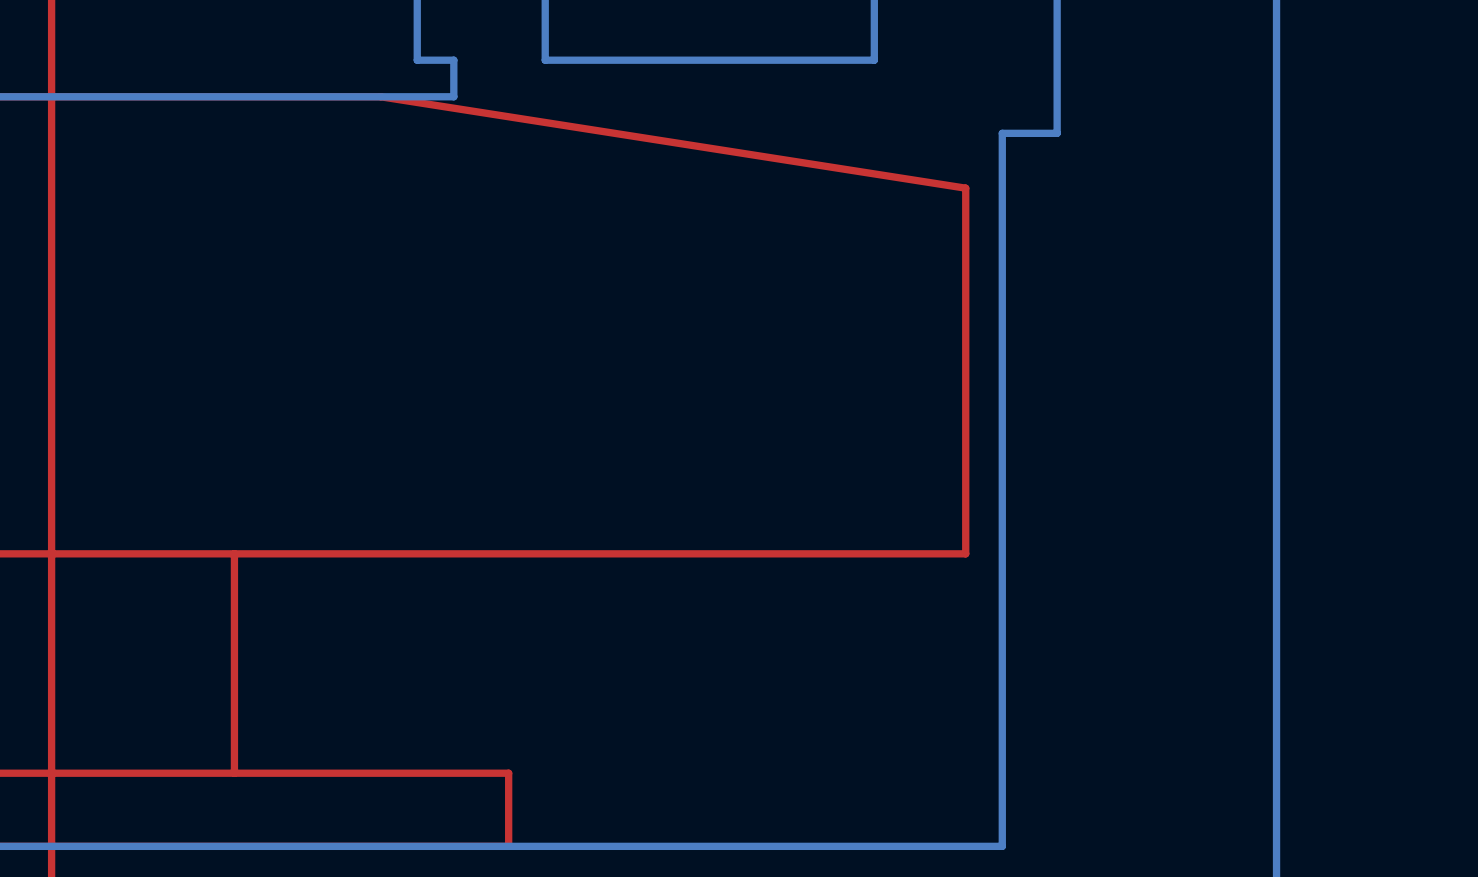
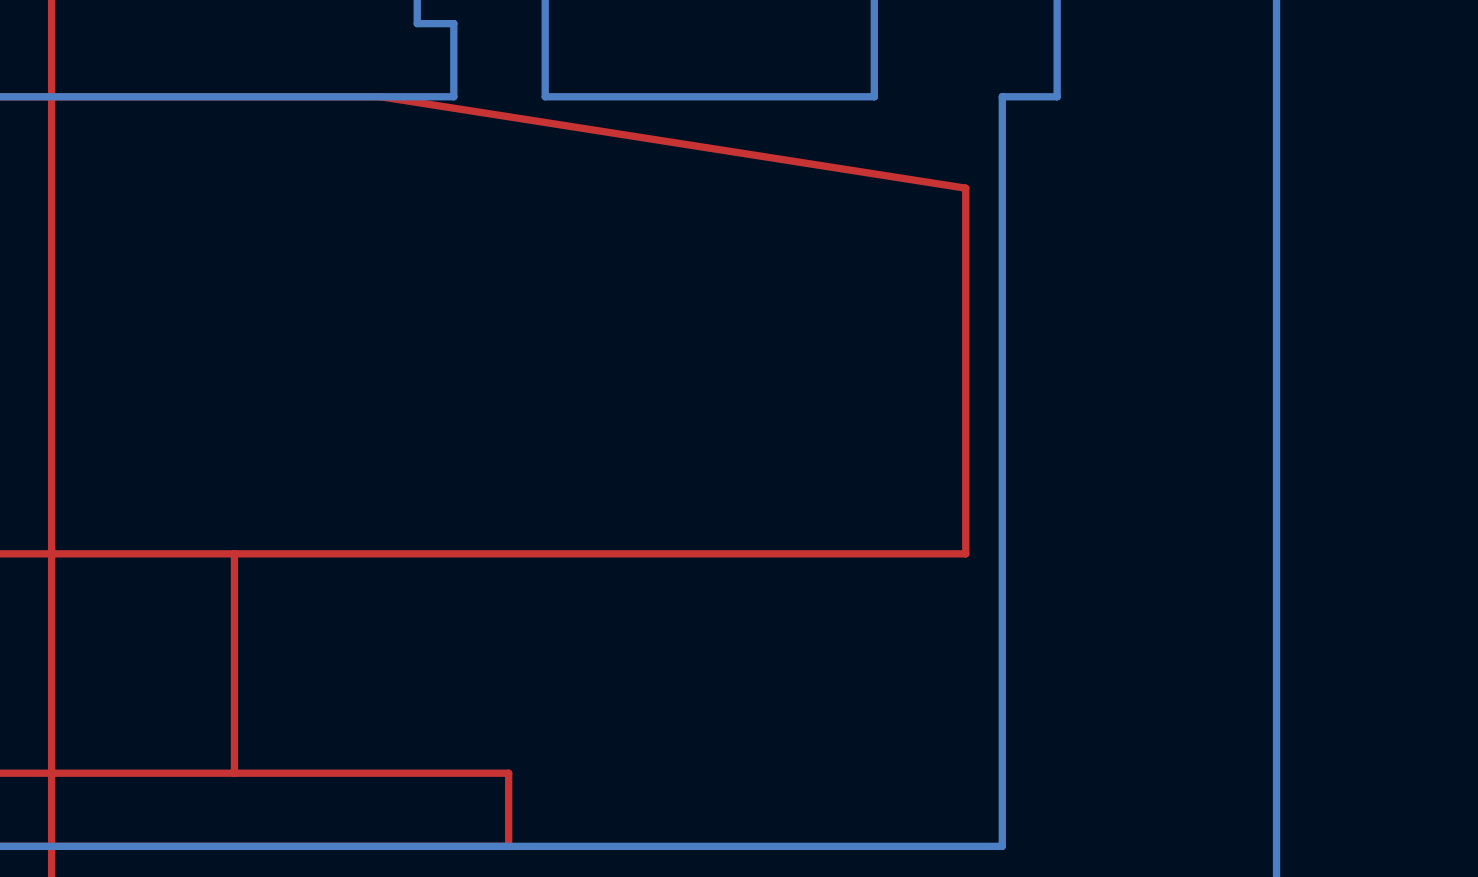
bottom track: (417, 23) (417, 60) (453, 60) -> (417, 23) (453, 23) (453, 60)
bottom track: (874, 60) (545, 60) -> (874, 60) (874, 96) (545, 96) (545, 60)
bottom track: (1057, 96) (1057, 133) (1002, 133) -> (1057, 96) (1002, 96) (1002, 133)

